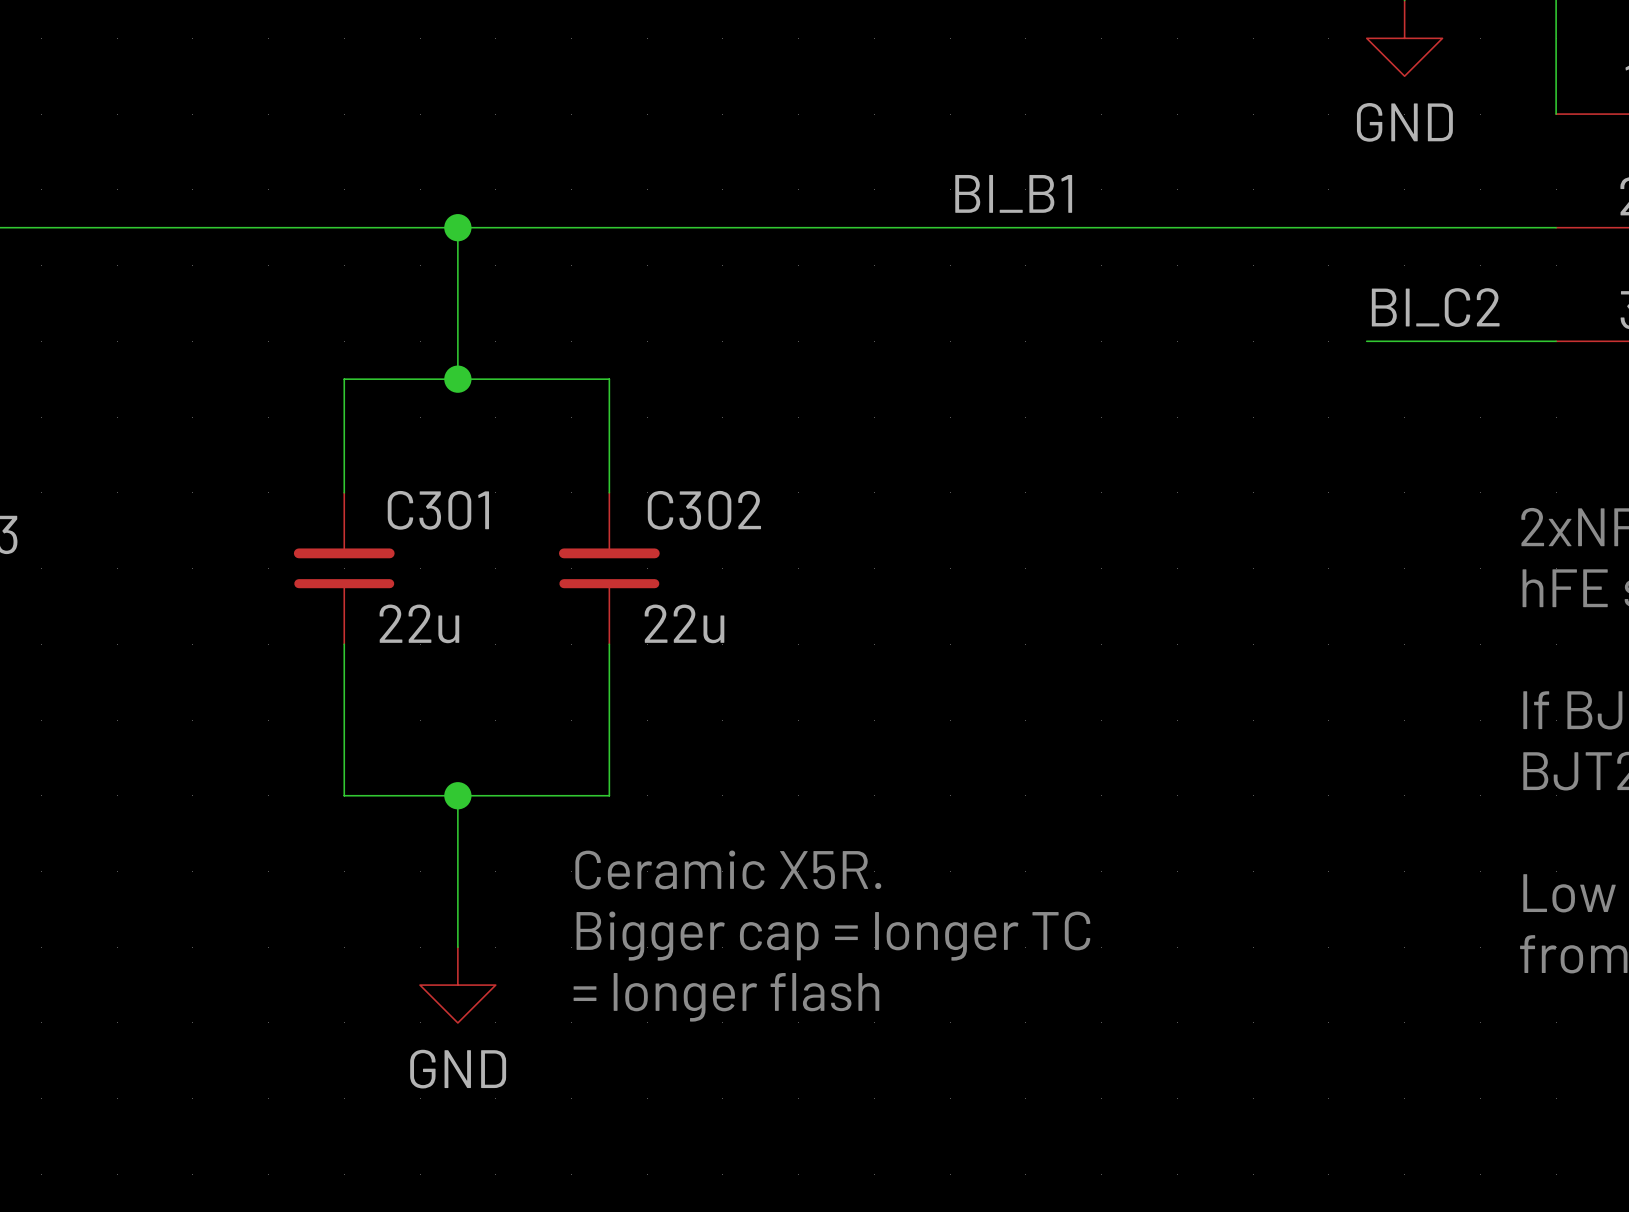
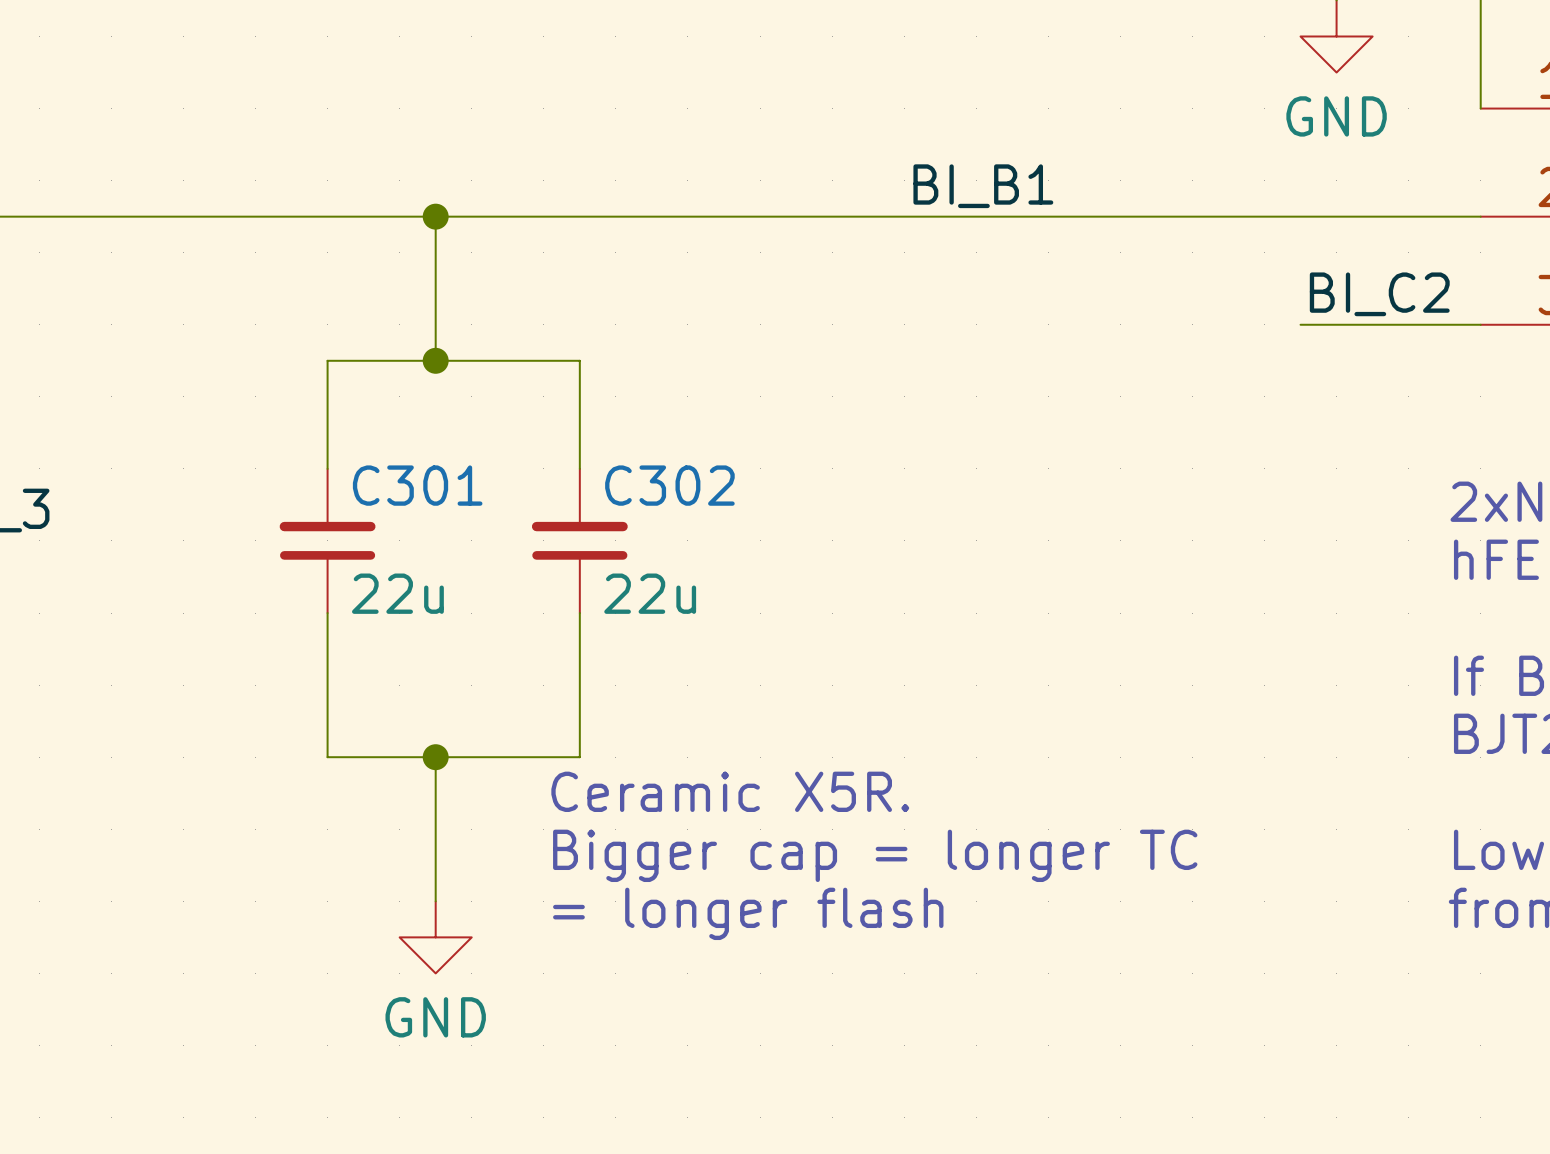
text position: Ceramic X5R. (728, 869) -> Ceramic X5R. (730, 791)
text position: Bigger cap = longer TC (833, 936) -> Bigger cap = longer TC (875, 855)
text position: = longer flash (726, 997) -> = longer flash (748, 913)

